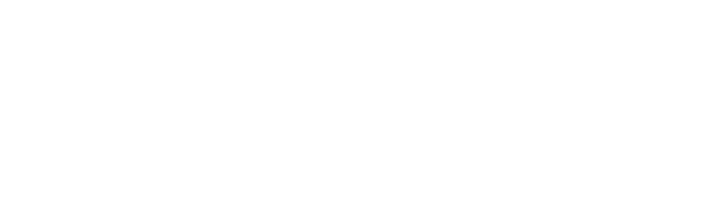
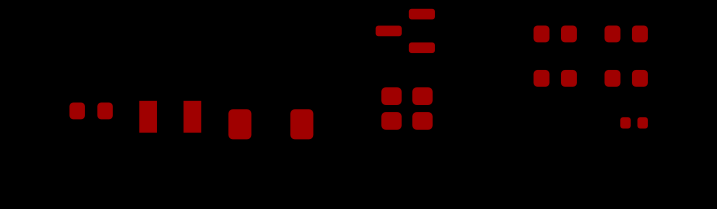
part: none -> (405, 30)
part: none -> (555, 33)
part: none -> (626, 33)
part: none -> (555, 78)
part: none -> (626, 78)
part: none -> (406, 108)
part: none -> (91, 110)
part: none -> (170, 116)
part: none -> (634, 122)
part: none -> (270, 124)

